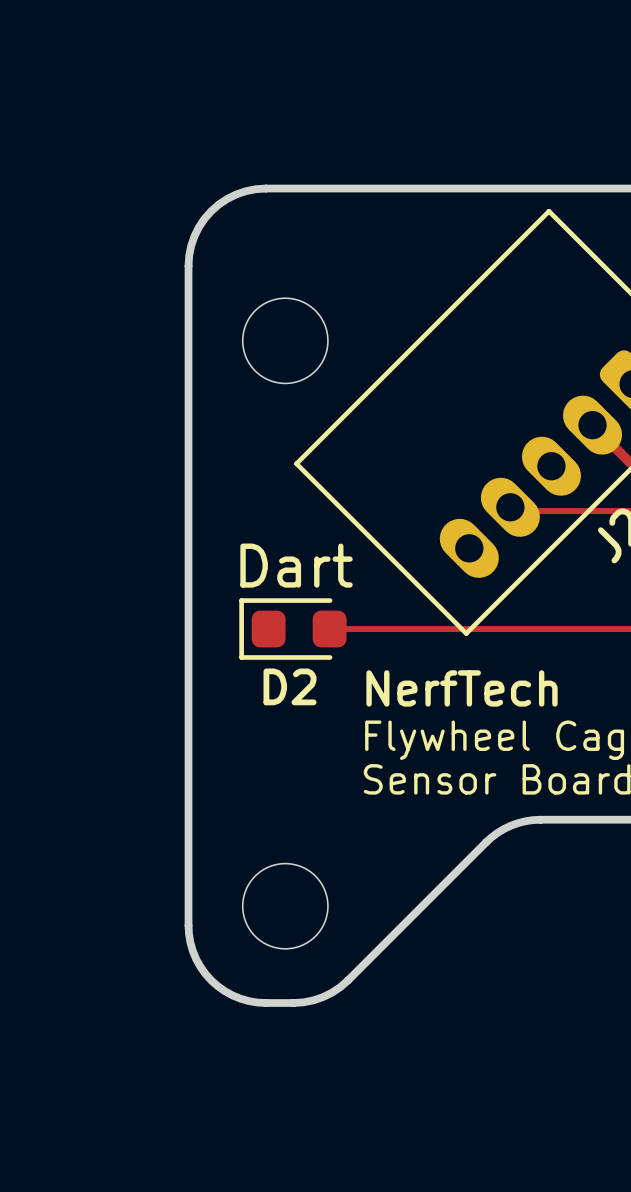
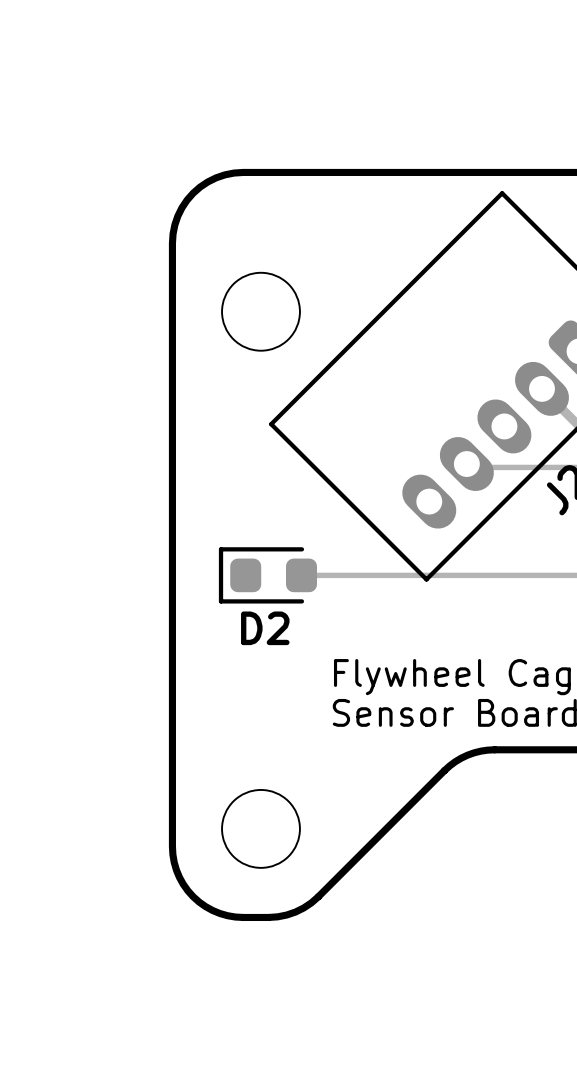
text: Dart (296, 565) -> none
text: NerfTech (462, 688) -> none

